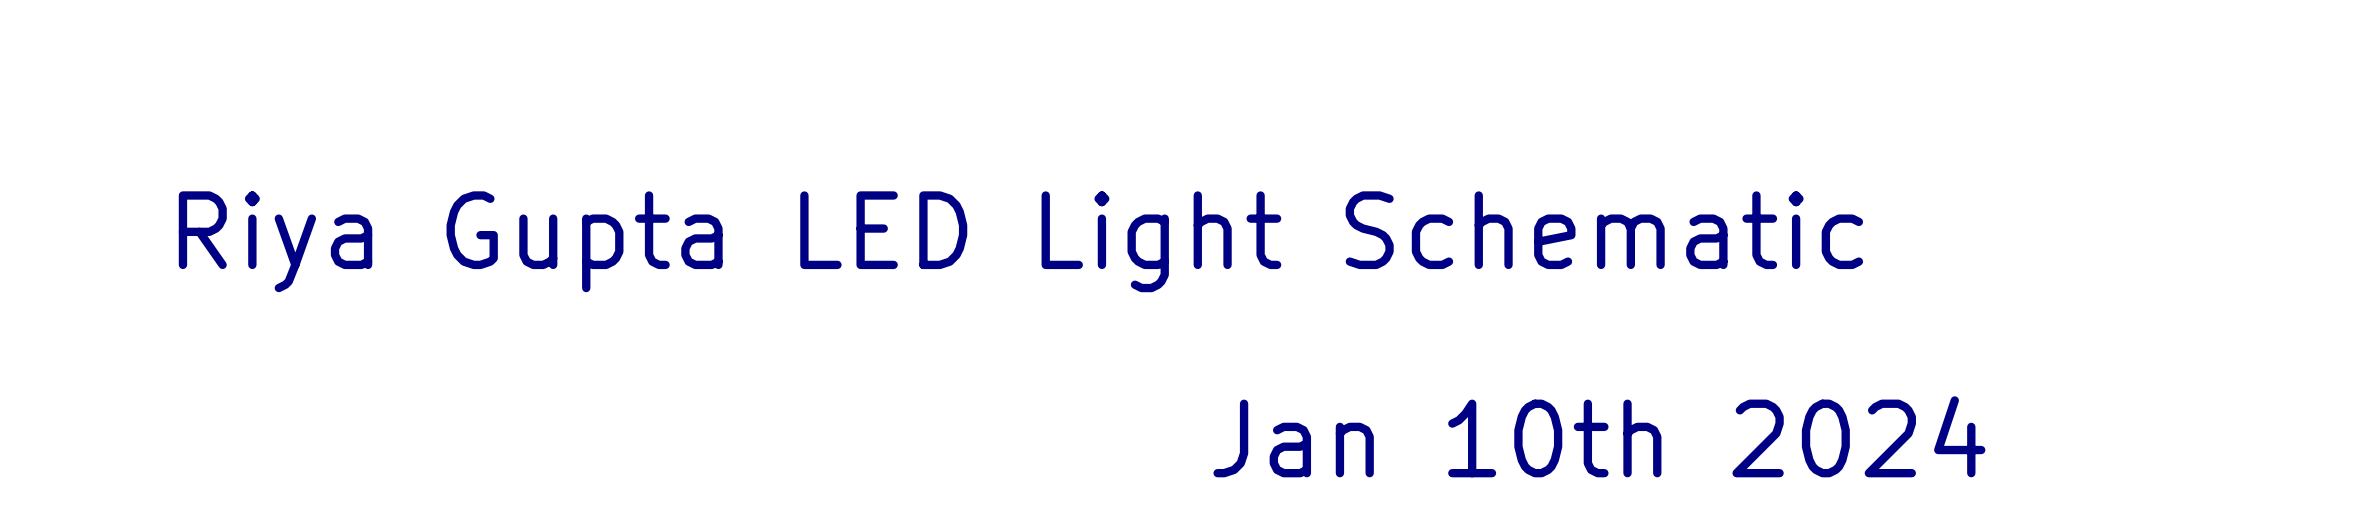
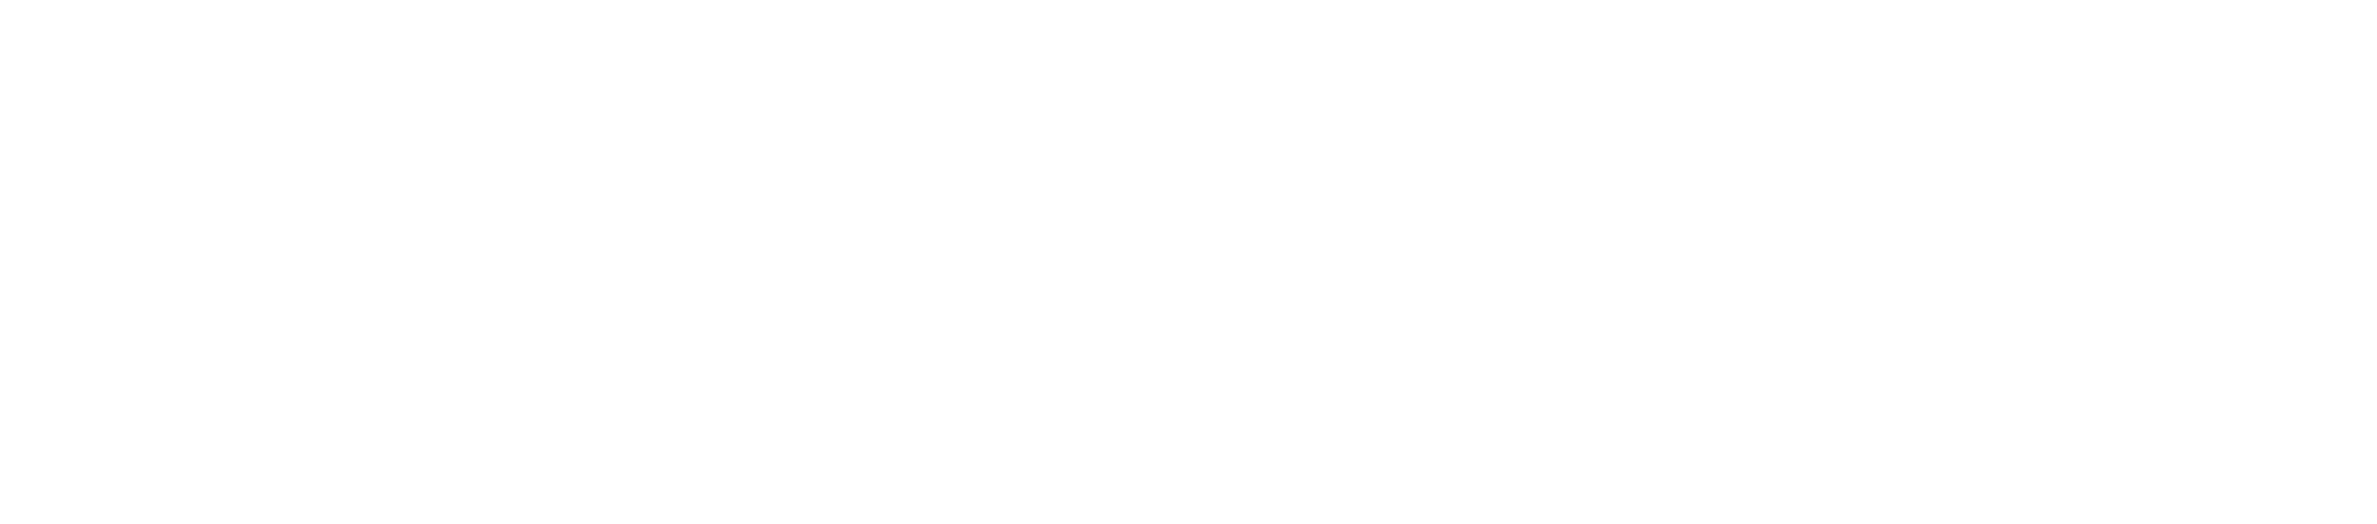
text: Riya Gupta LED Light Schematic (1020, 241) -> none
text: Jan 10th 2024 (1599, 436) -> none

